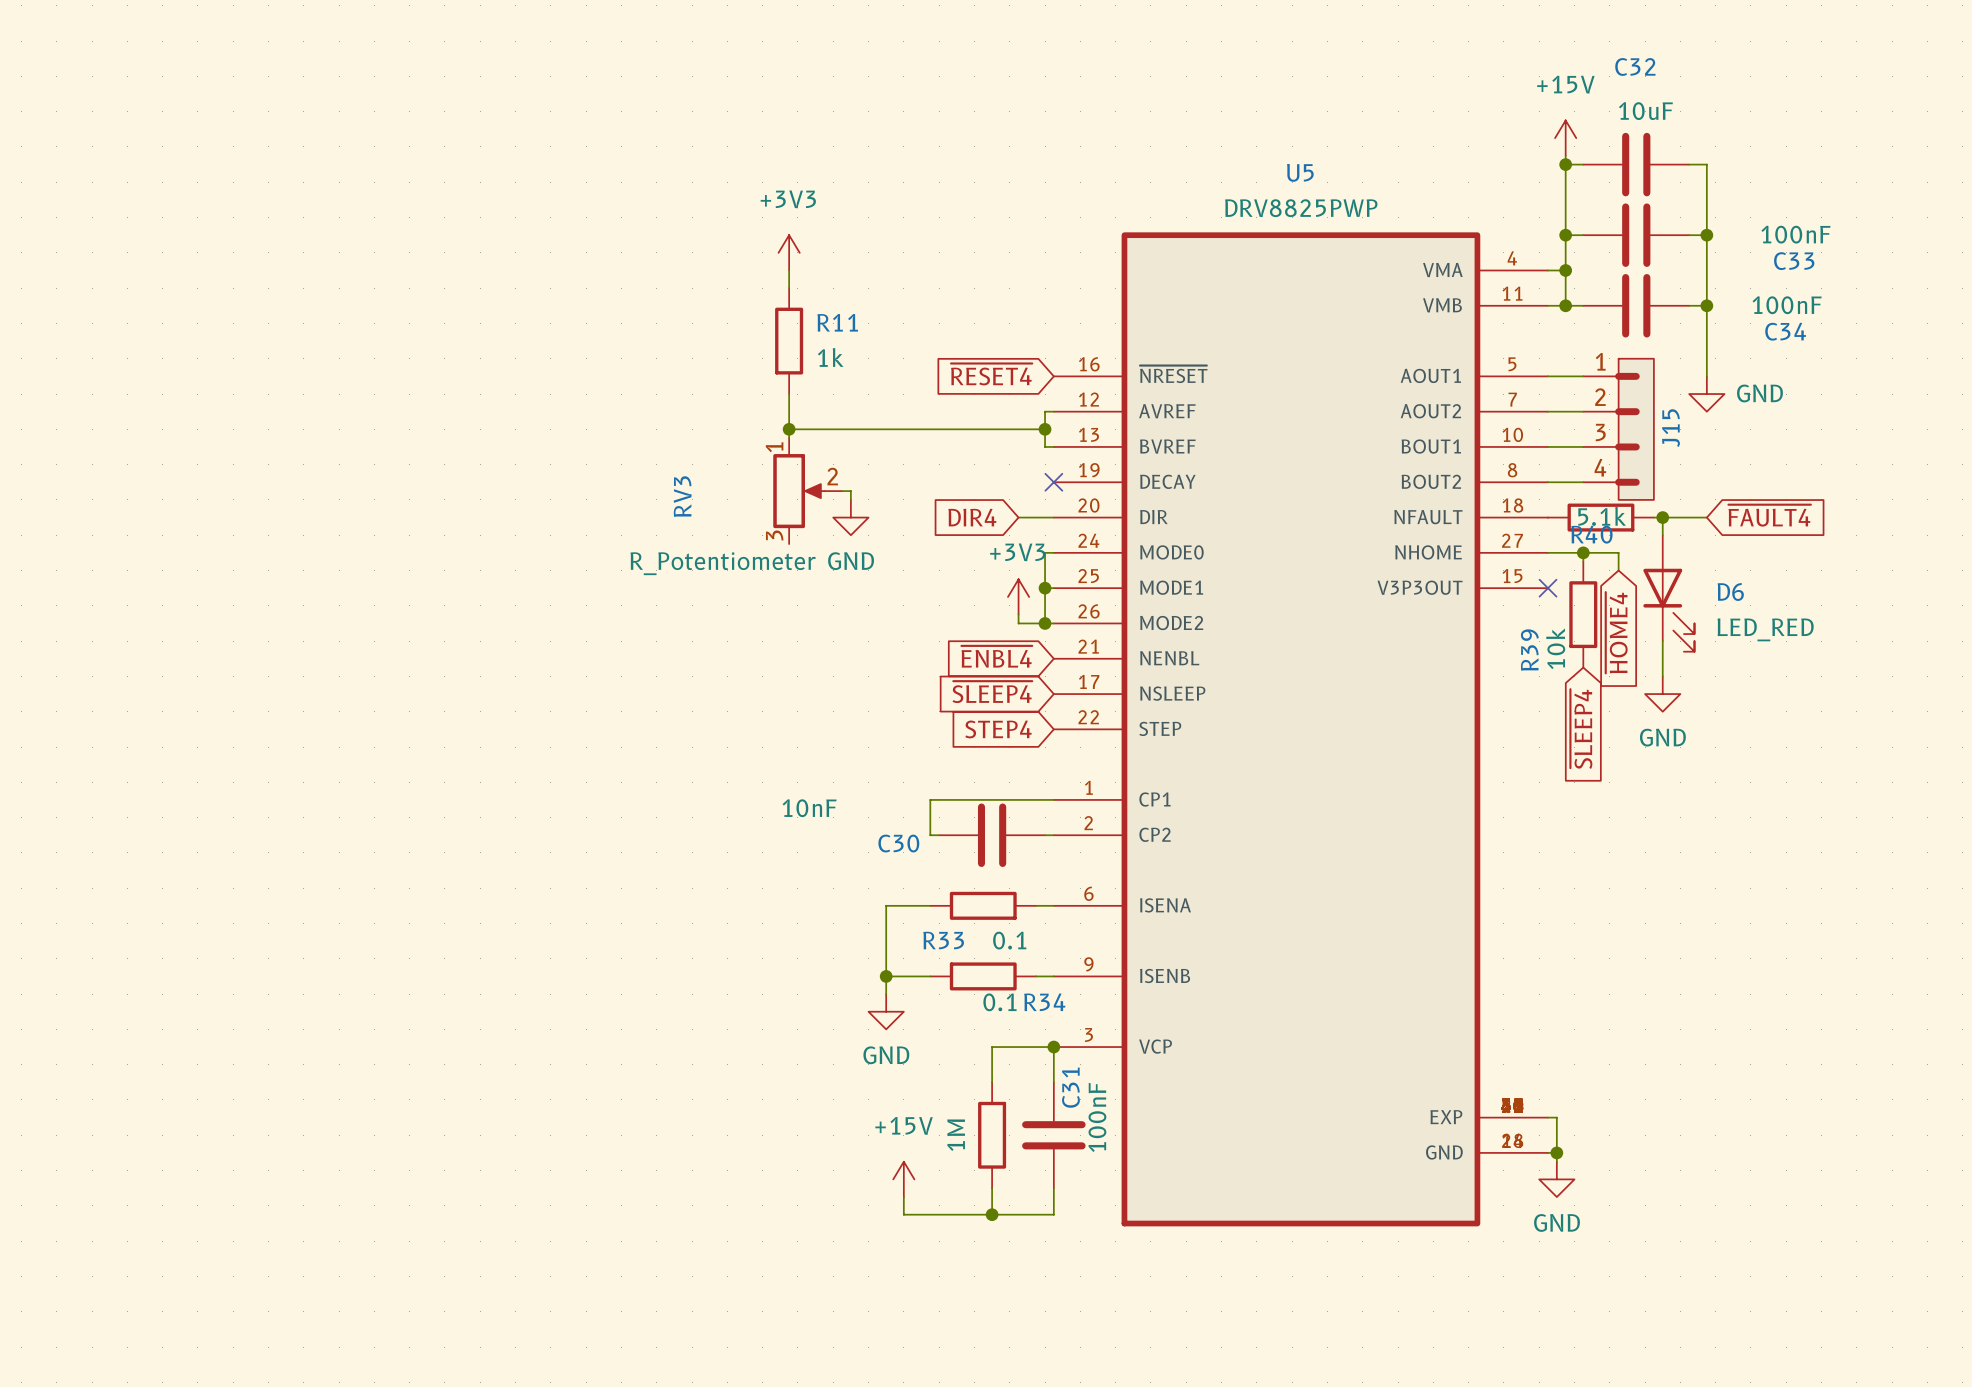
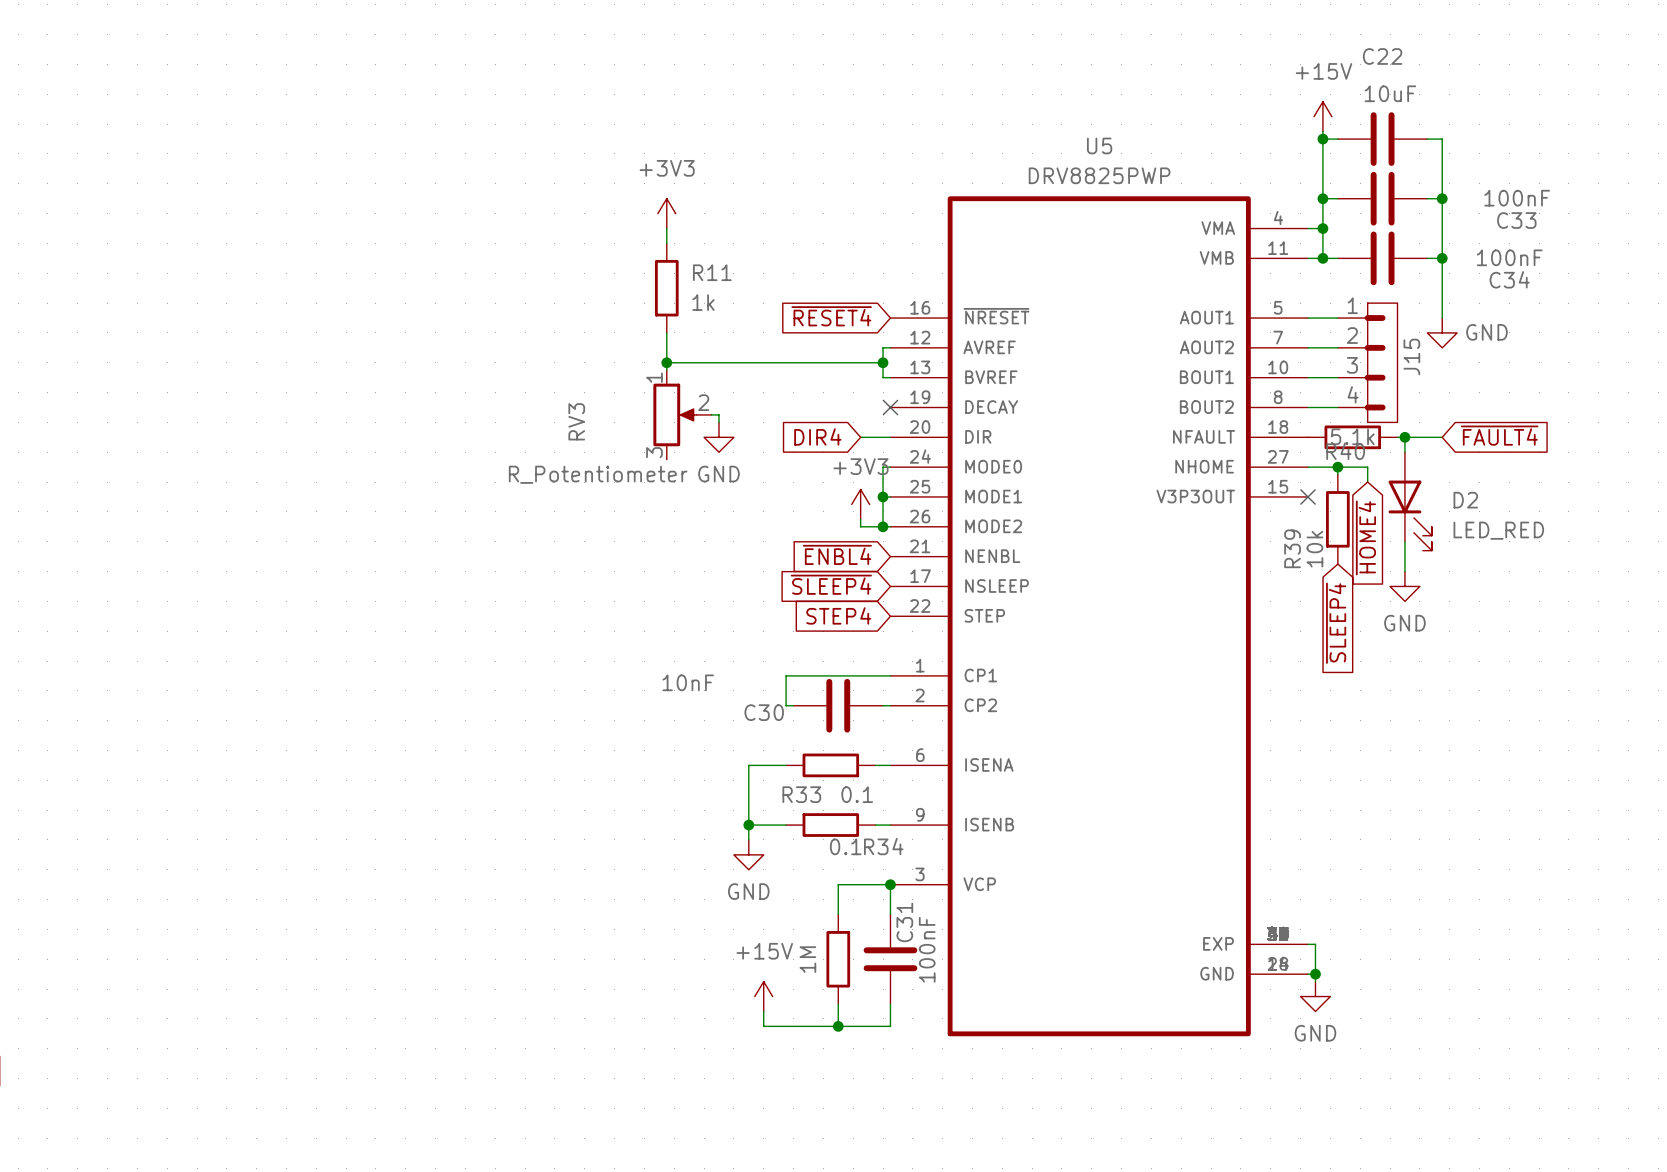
C32 name: C32 (1635, 66) -> C22 (1382, 56)
D6 name: D6 (1730, 592) -> D2 (1465, 500)

